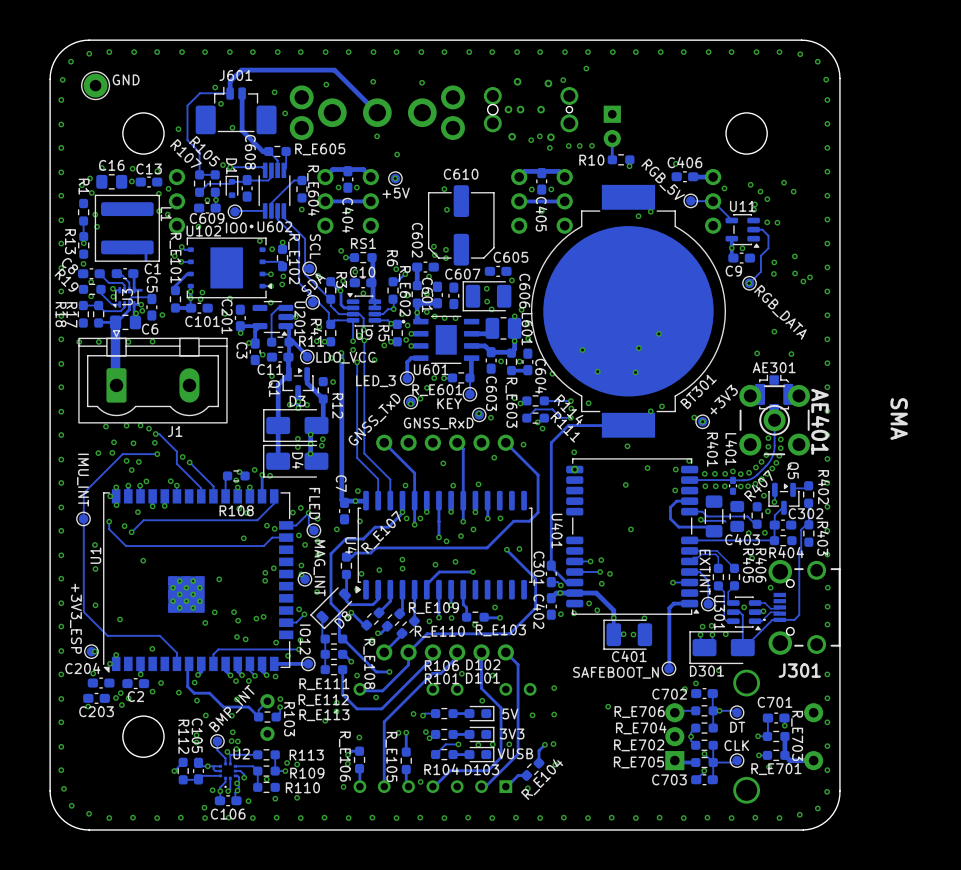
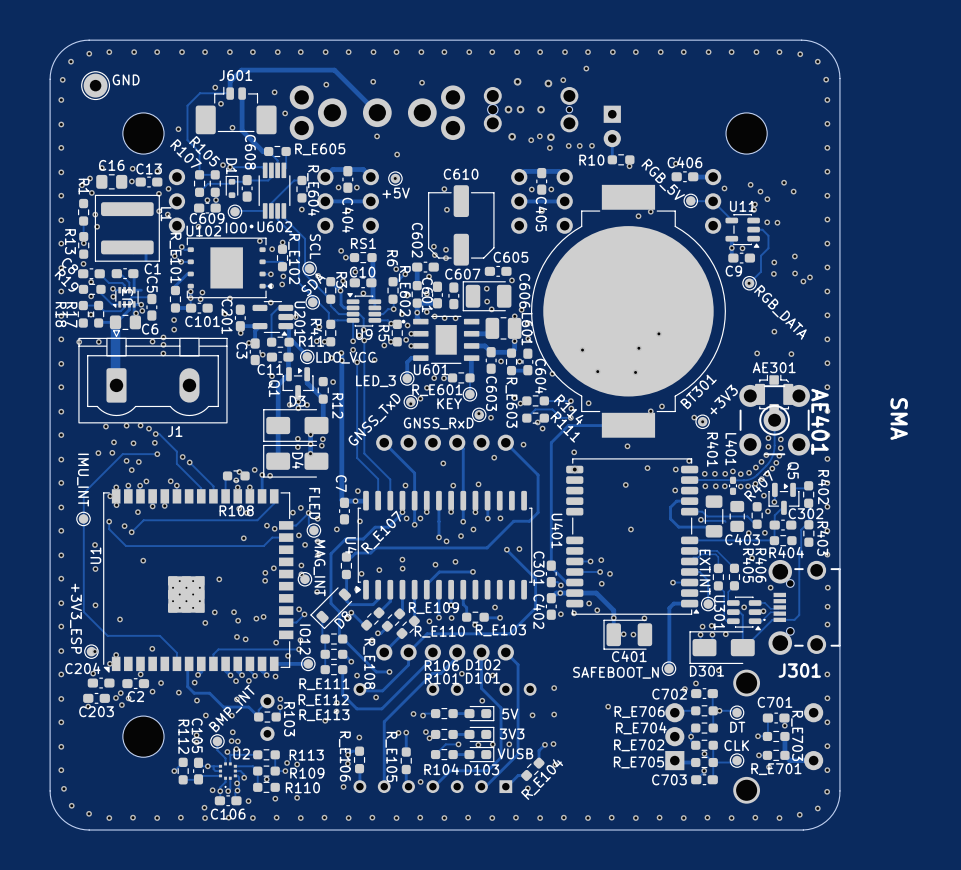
via: none -> (90, 314)
via: (162, 315) -> none
via: none -> (174, 320)
via: none -> (174, 329)
via: none -> (163, 337)
via: (128, 341) -> none
via: none -> (163, 344)
via: none -> (163, 353)

